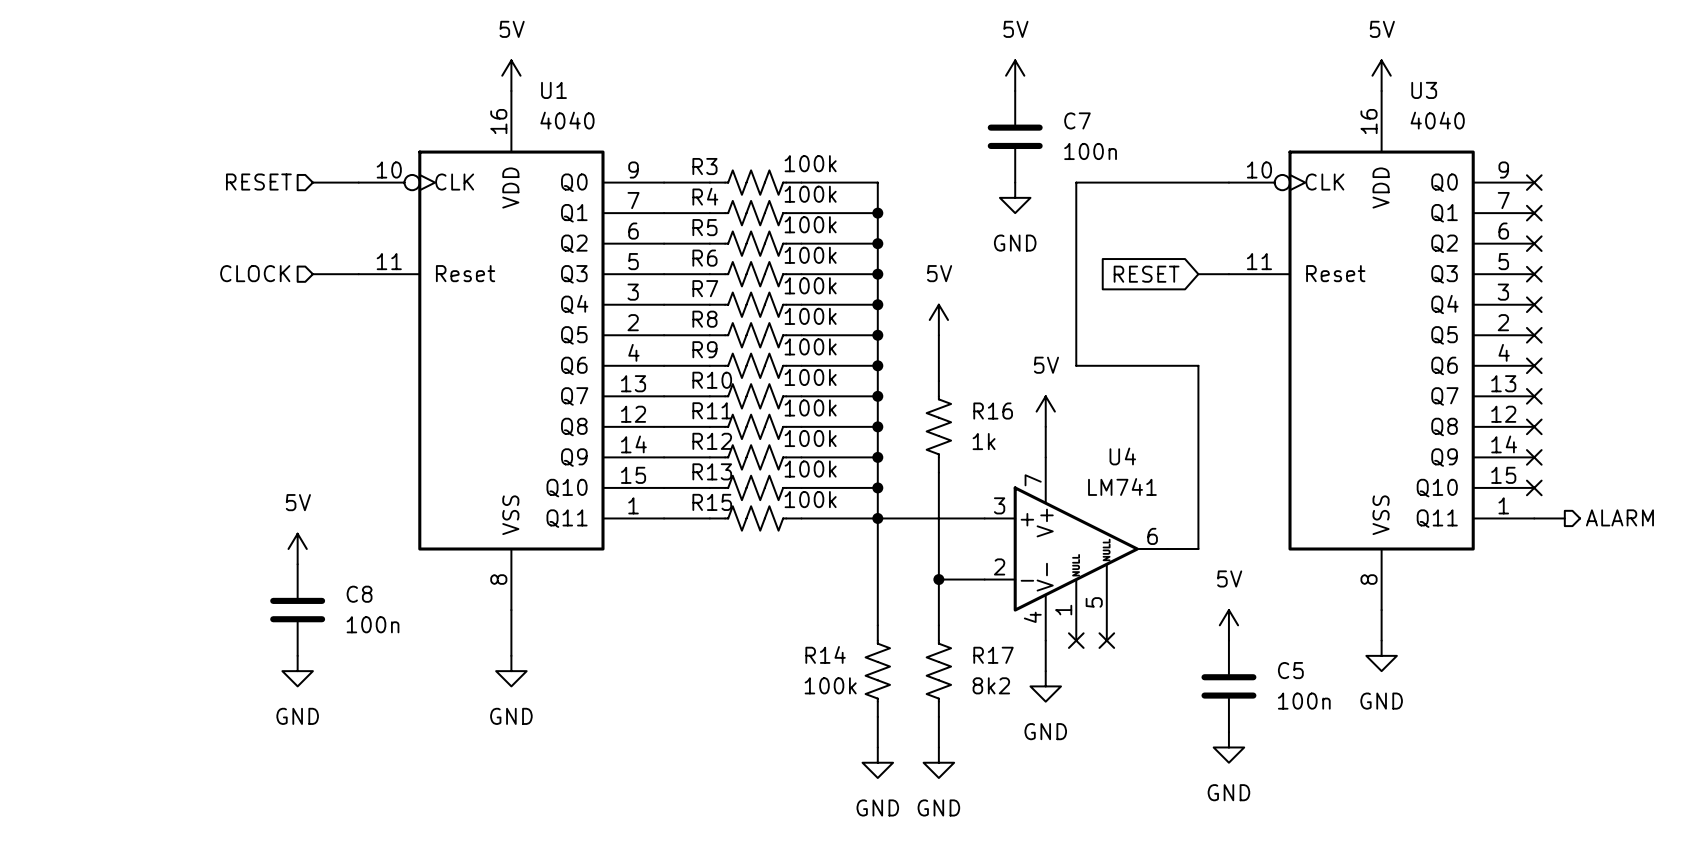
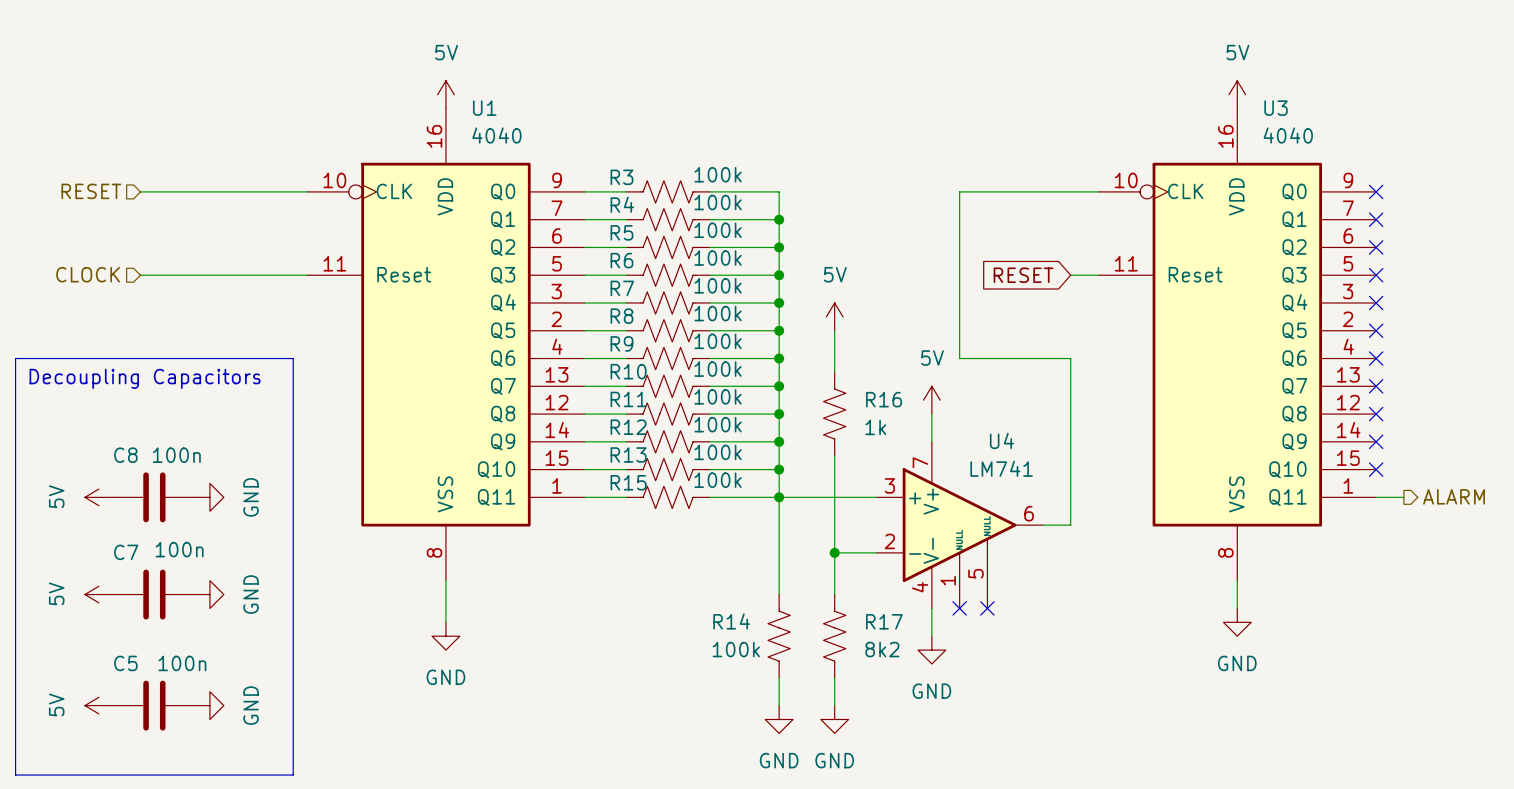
power symbol: 5V (1015, 75) -> none
C7 name position: C7 (1077, 120) -> C7 (126, 552)
C7 rotation: 0° (1015, 136) -> 90° clockwise (154, 594)
C7 position: (1015, 136) -> (154, 594)
C7 value position: 100n (1090, 151) -> 100n (179, 549)
wire: none -> (140, 191) (265, 191)
hierarchical label position: RESET (258, 182) -> RESET (91, 191)
power symbol: GND (1015, 197) -> none
hierarchical label position: CLOCK (255, 273) -> CLOCK (88, 274)
wire: none -> (140, 275) (265, 275)
line: none -> (15, 358) (293, 358) (293, 775) (15, 775) (15, 358)
text: none -> Decoupling Capacitors (145, 378)
power symbol: none -> 5V (98, 497)
power symbol: none -> GND (209, 497)
power symbol: 5V (297, 549) -> none
C8 name position: C8 (359, 594) -> C8 (125, 455)
C8 rotation: 0° (297, 610) -> 90° clockwise (154, 497)
C8 position: (297, 610) -> (154, 497)
C8 value position: 100n (373, 624) -> 100n (176, 455)
power symbol: none -> 5V (98, 594)
power symbol: none -> GND (209, 594)
power symbol: 5V (1228, 625) -> none
C5 name position: C5 (1290, 670) -> C5 (125, 663)
power symbol: GND (297, 671) -> none
C5 rotation: 0° (1228, 686) -> 90° clockwise (154, 705)
C5 position: (1228, 686) -> (154, 705)
C5 value position: 100n (1304, 701) -> 100n (182, 663)
power symbol: none -> 5V (98, 705)
power symbol: none -> GND (209, 705)
power symbol: GND (1228, 747) -> none

